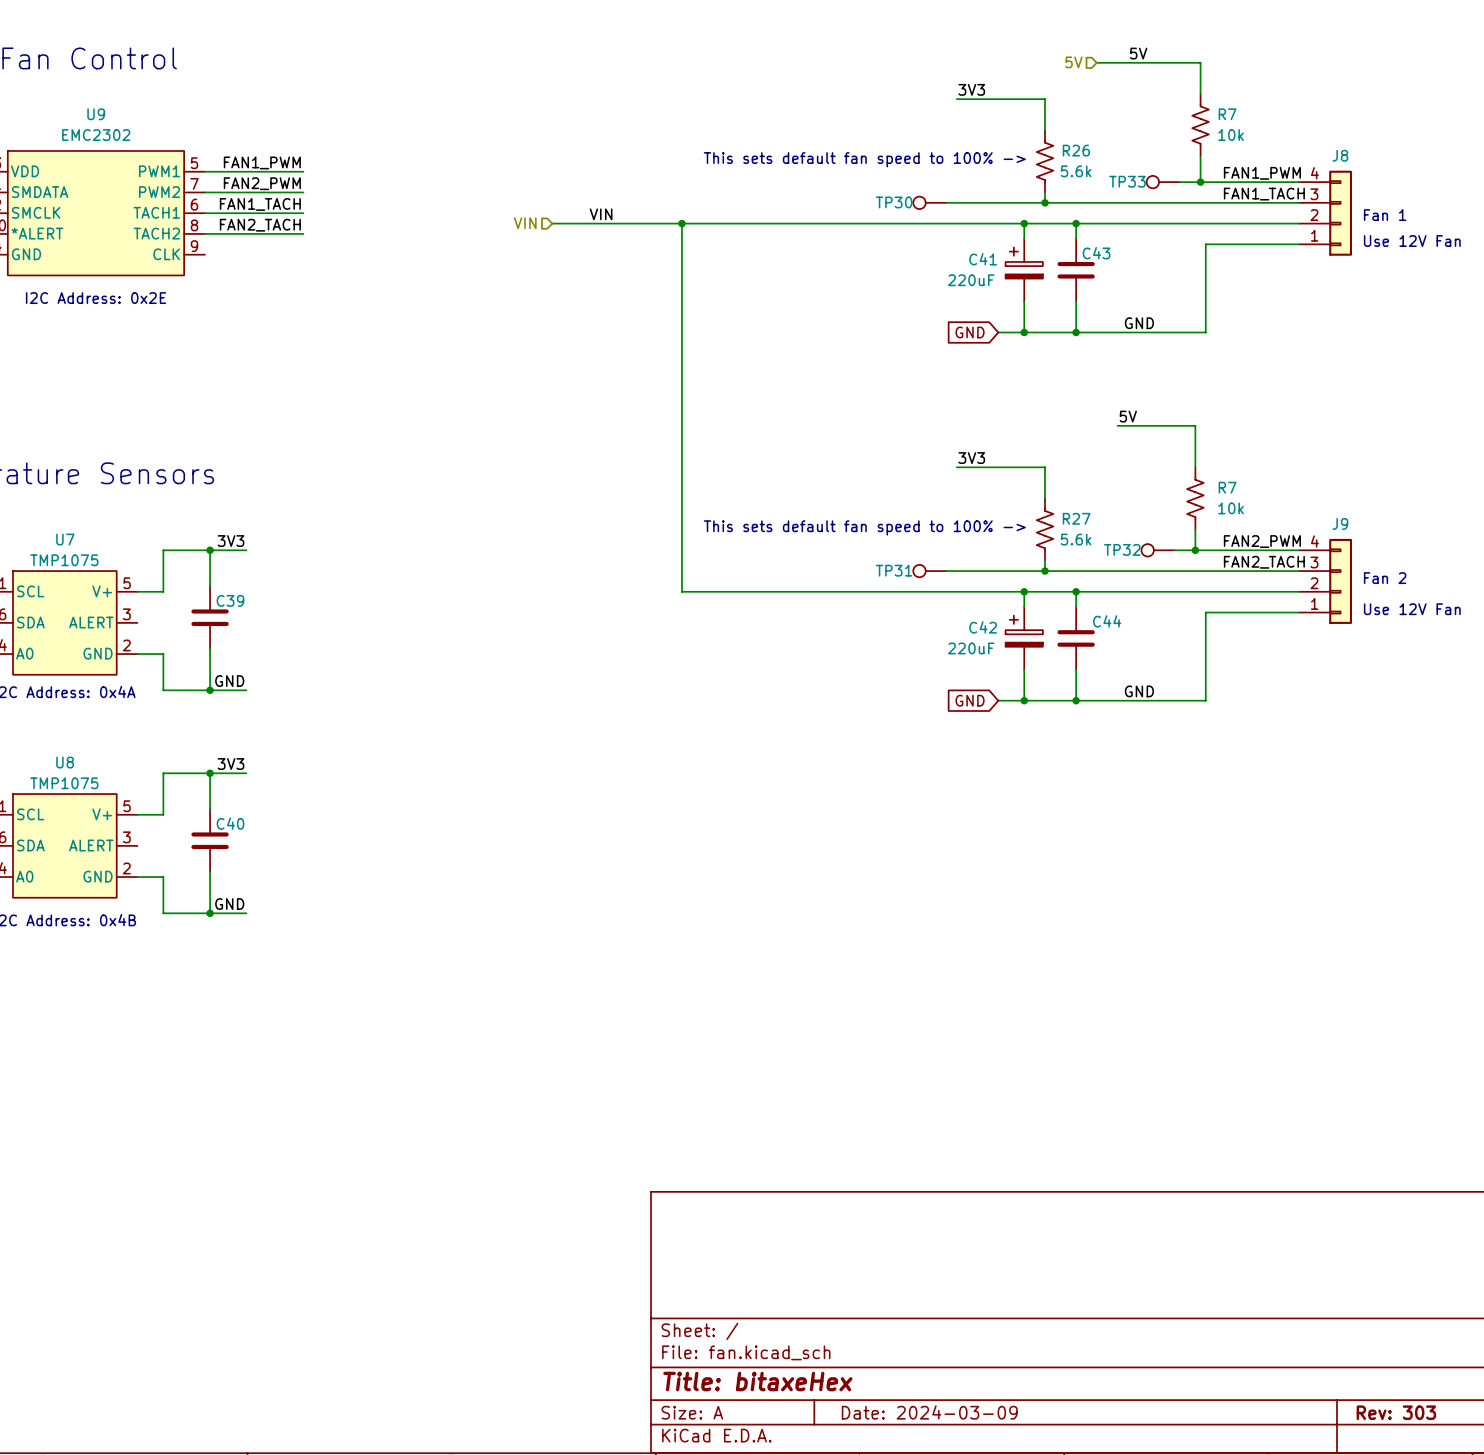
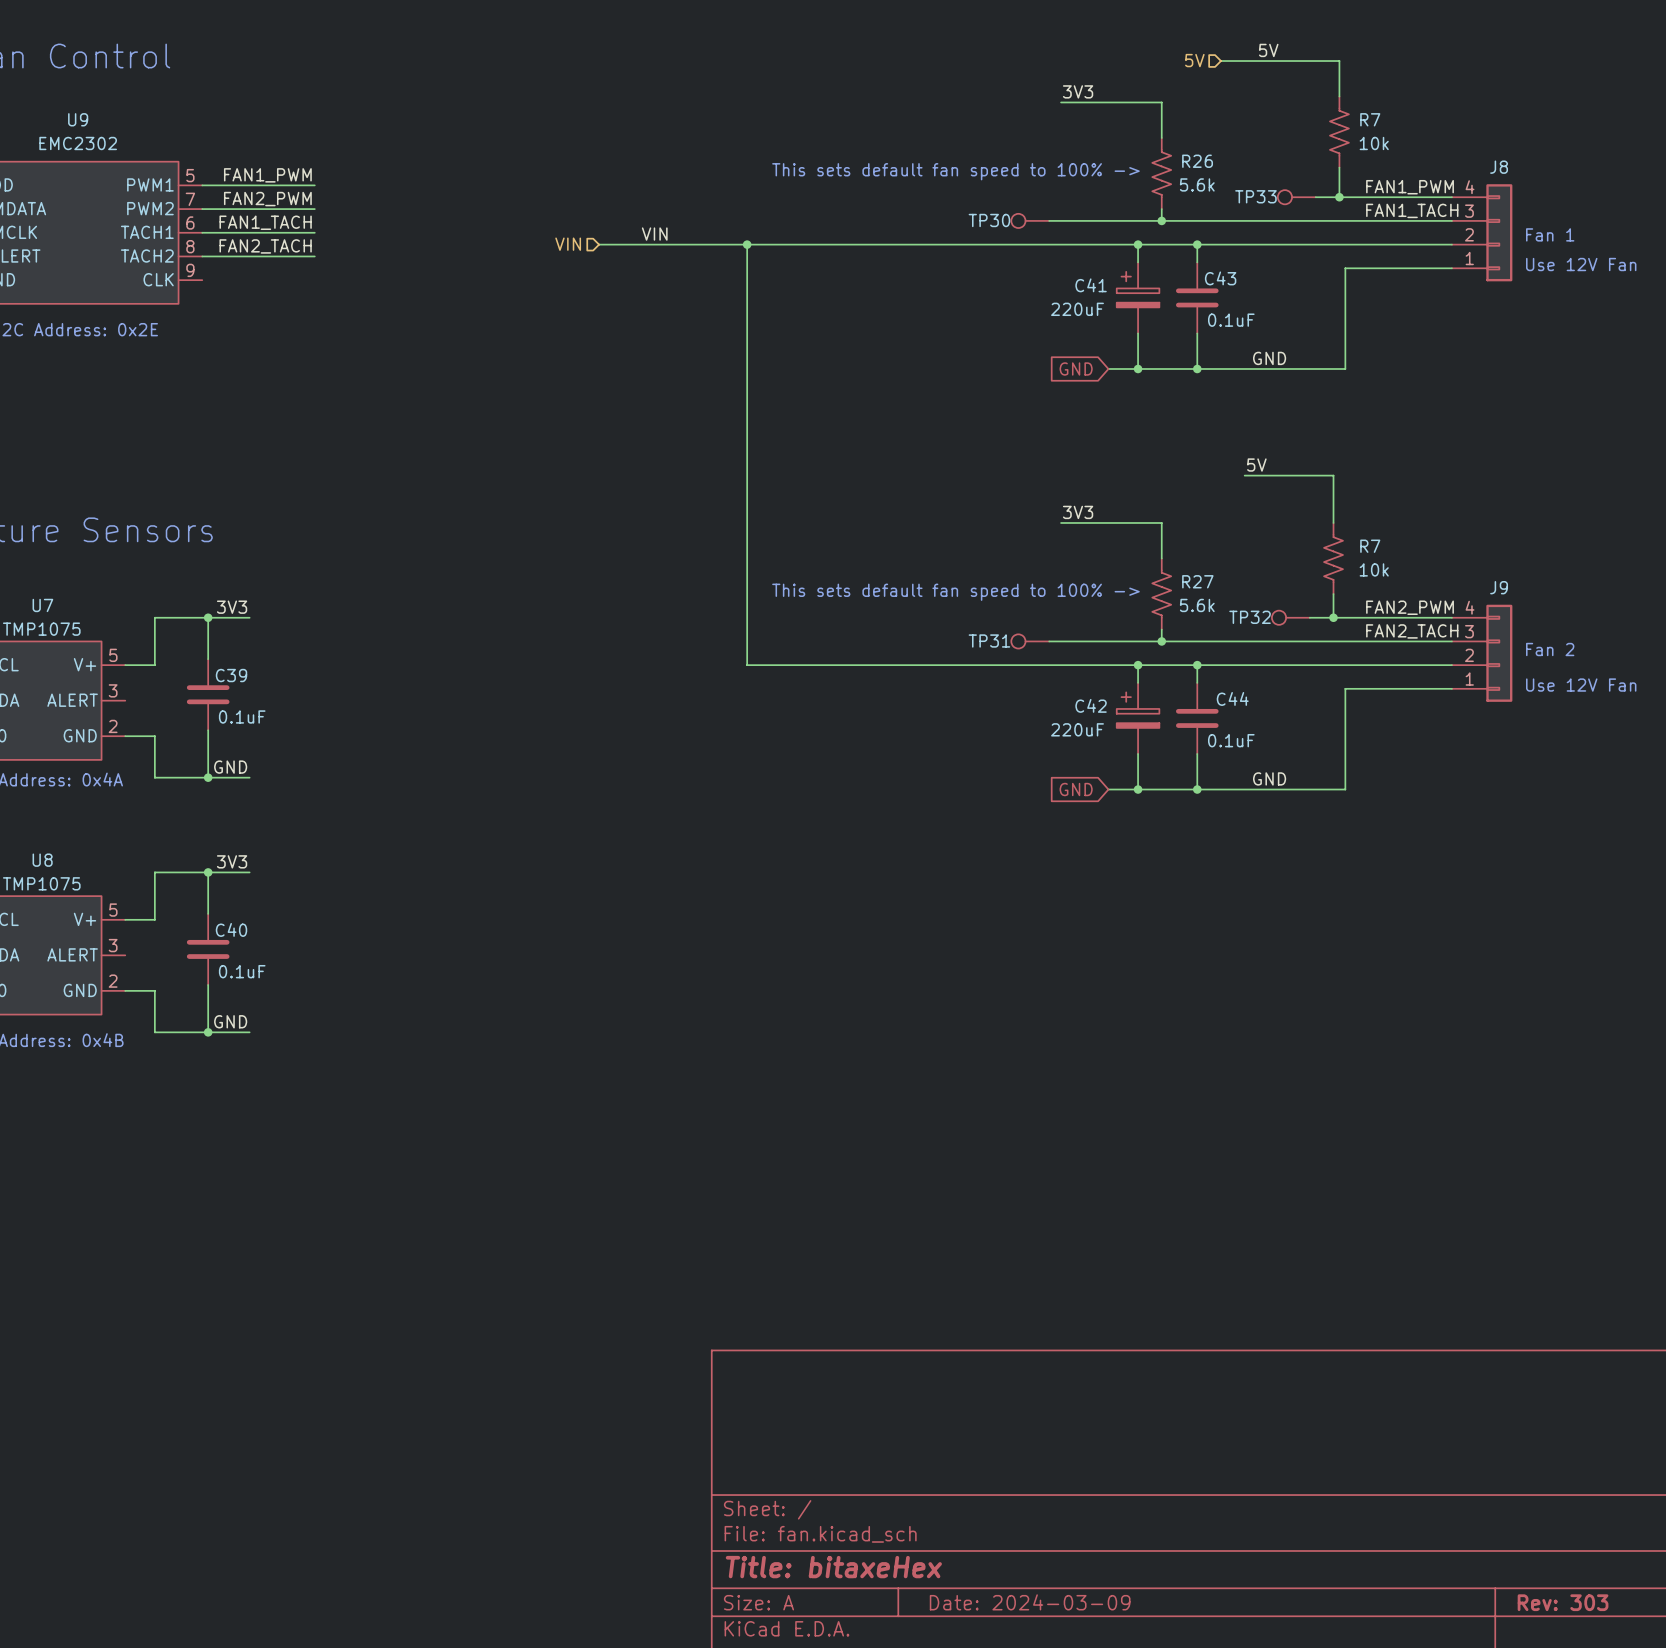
C43 value: none -> 0.1uF (1231, 320)
C39 value: none -> 0.1uF (242, 716)
C44 value: none -> 0.1uF (1231, 740)
C40 value: none -> 0.1uF (242, 971)

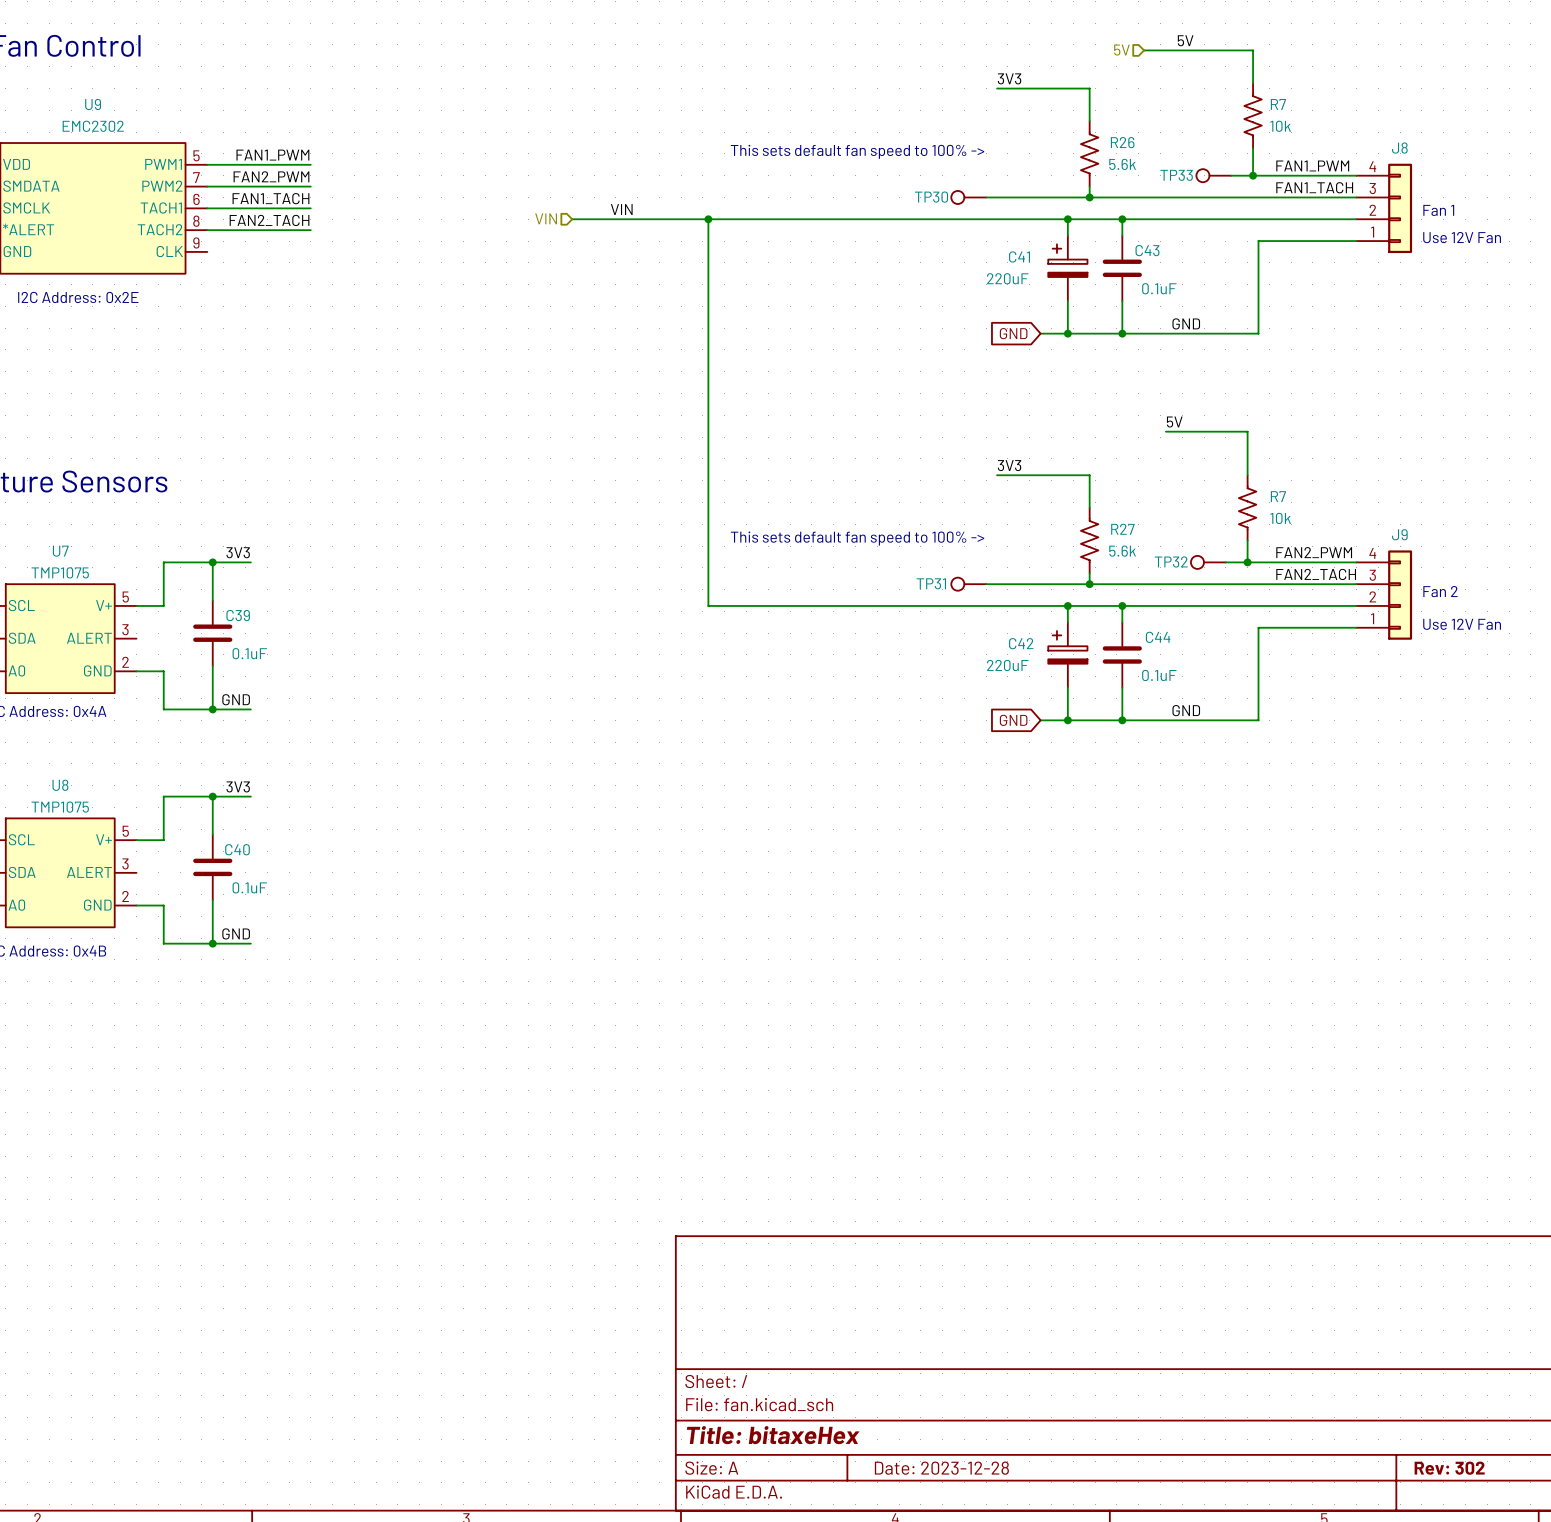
title block: Date: 2024-03-09 (1030, 1602) -> Date: 2023-12-28 (941, 1468)
title block: Rev: 303 (1563, 1602) -> Rev: 302 (1449, 1468)

